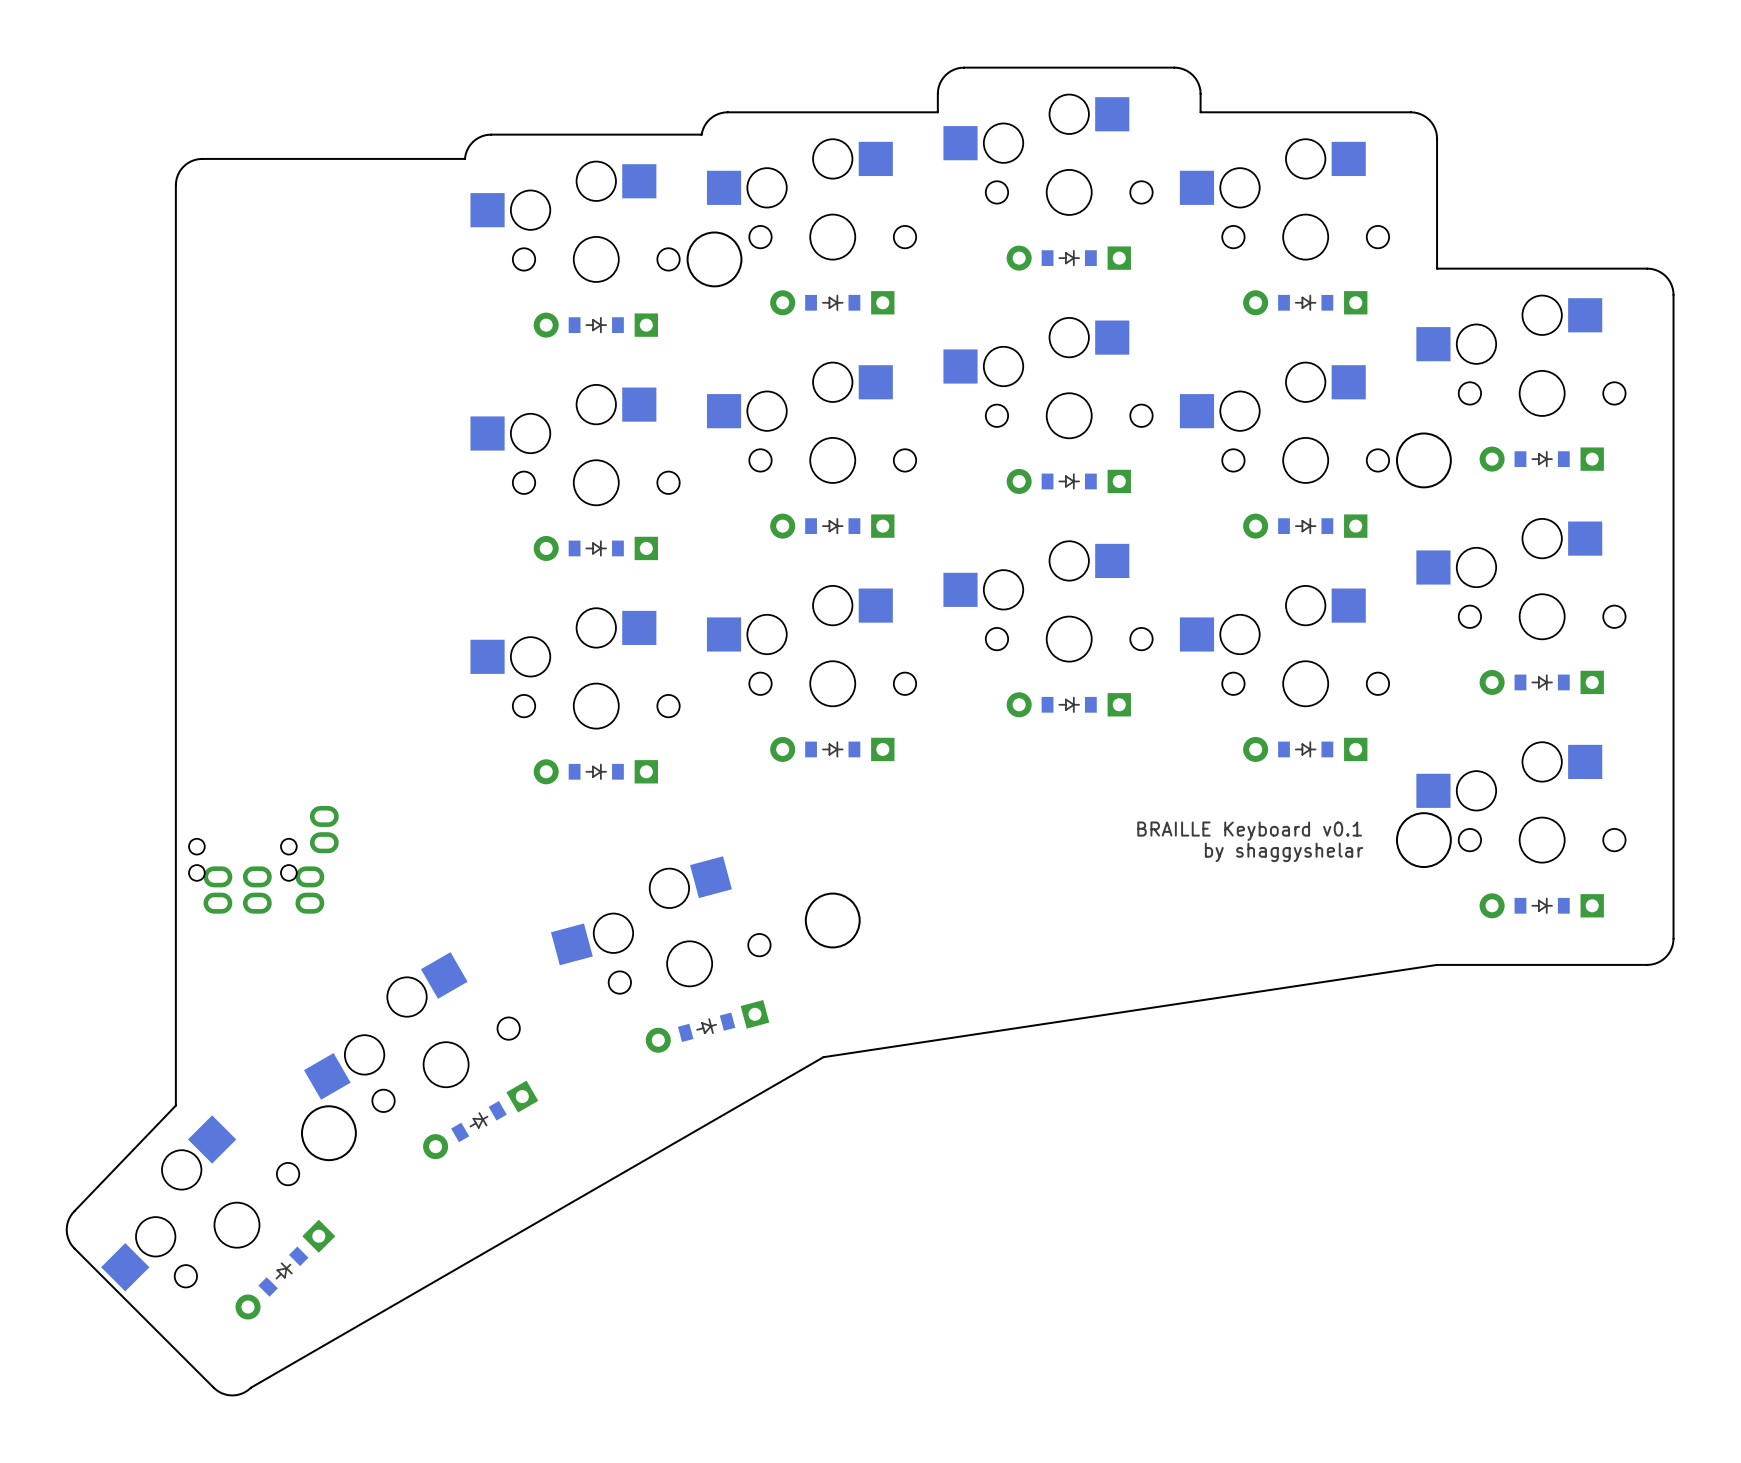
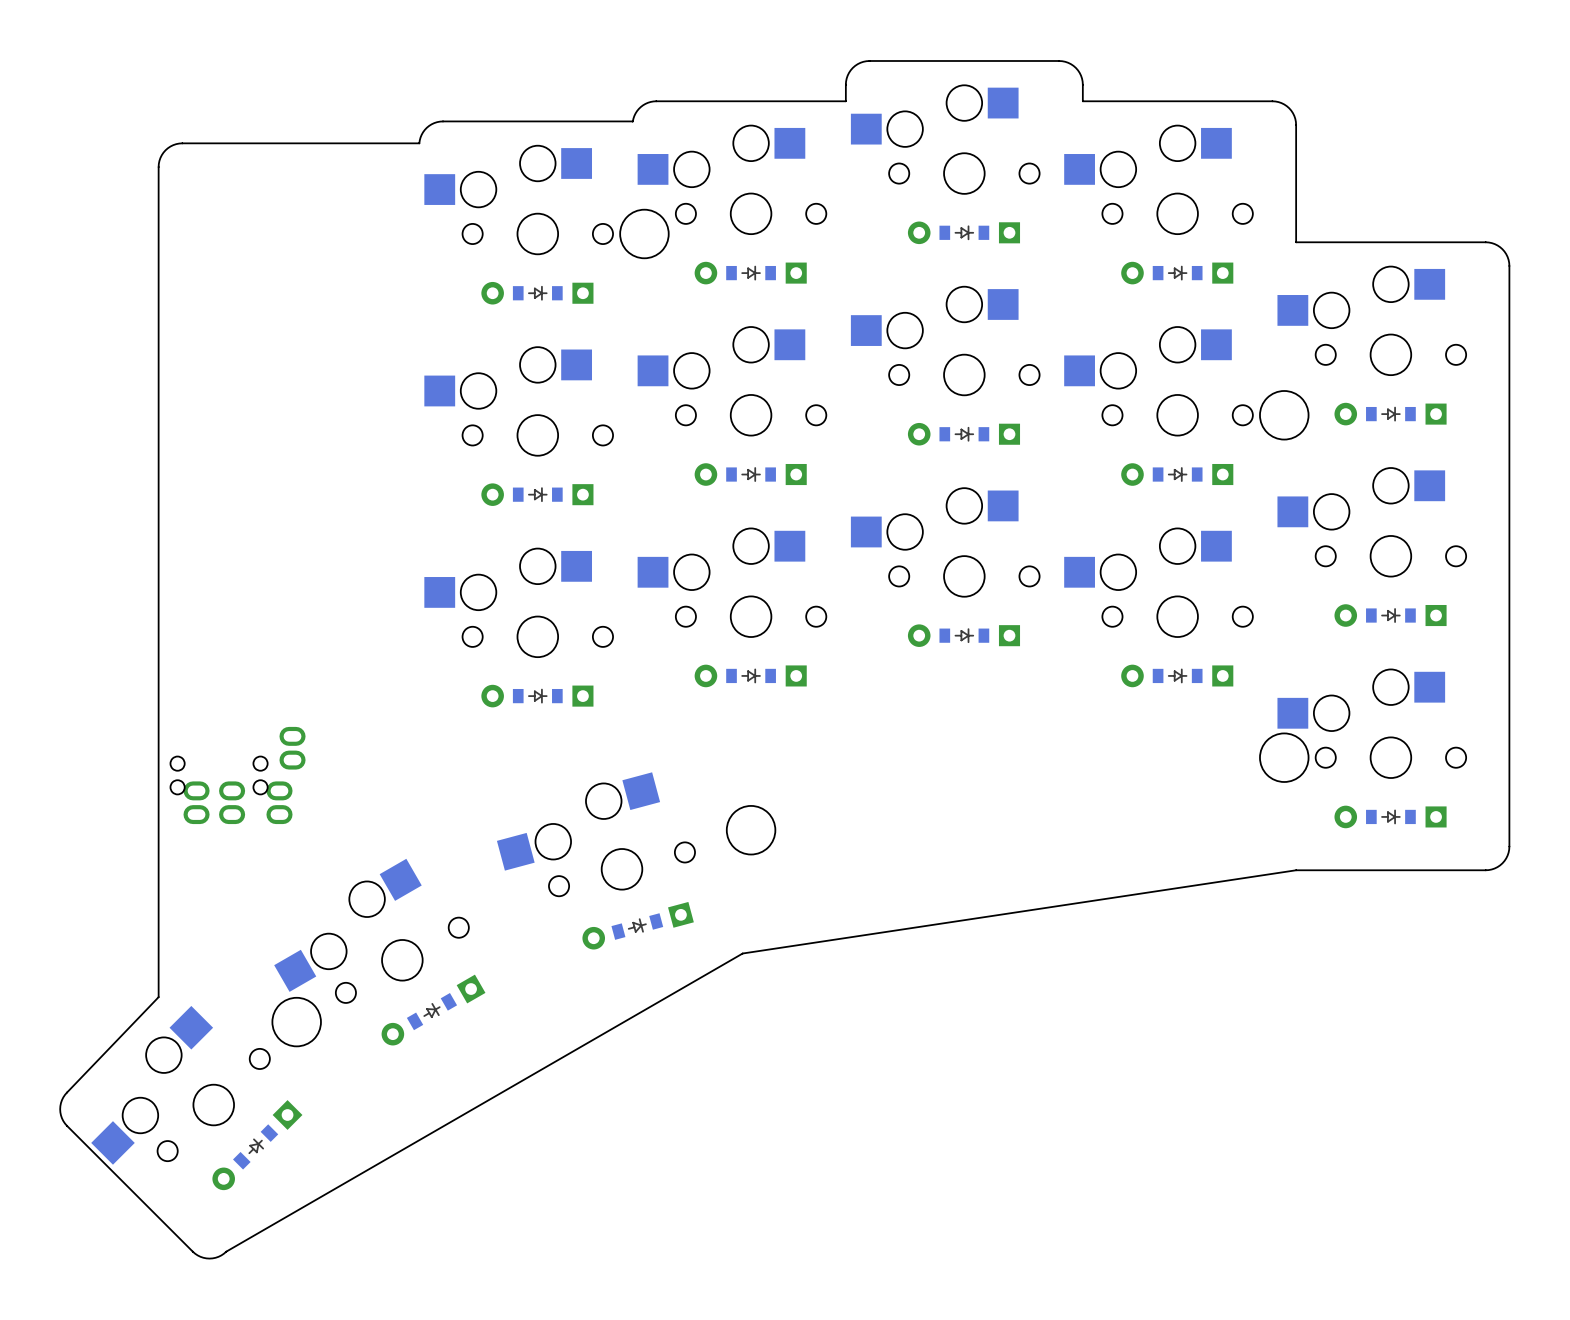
text: BRAILLE Keyboard v0.1 (1249, 831) -> none
text: by shaggyshelar (1284, 852) -> none

